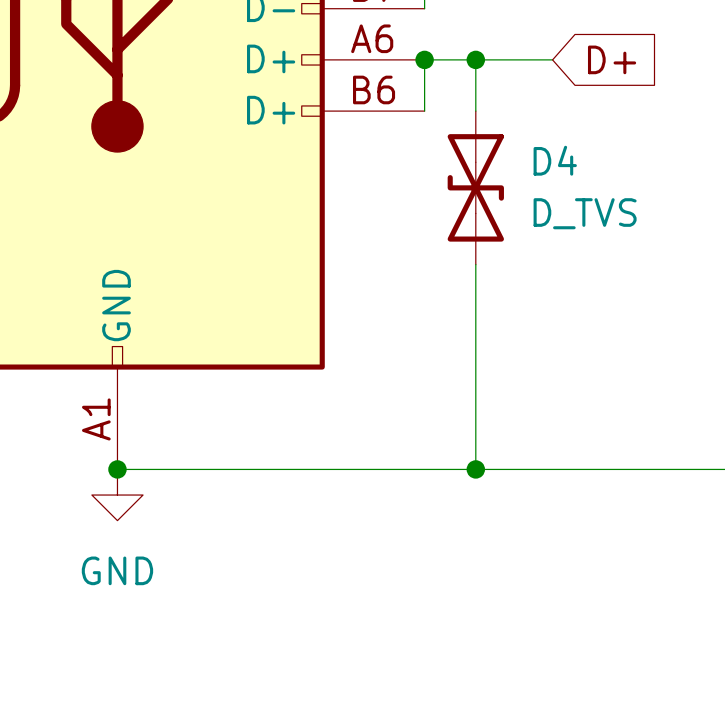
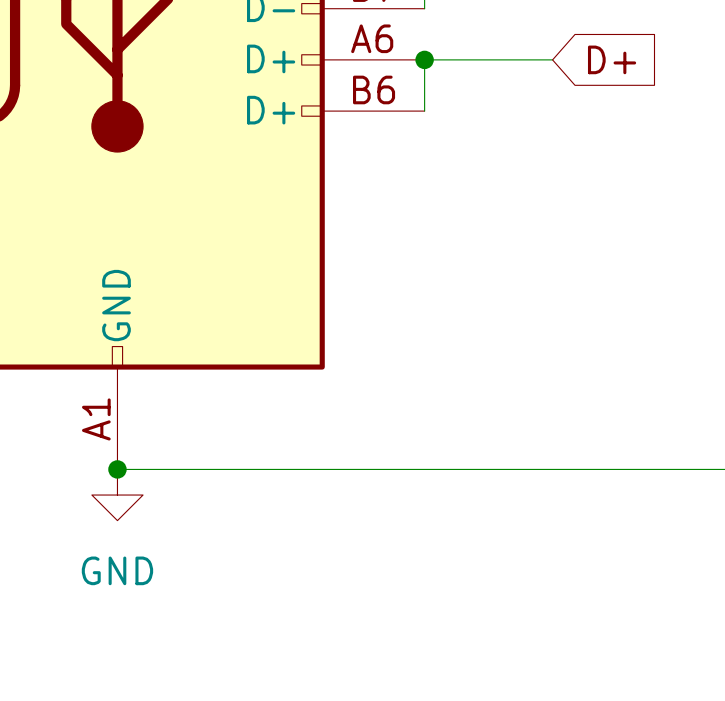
wire: (475, 59) (475, 111) -> none
junction: (475, 59) -> none
D4: D_TVS (475, 187) -> none
wire: (475, 264) (475, 469) -> none
junction: (475, 469) -> none

